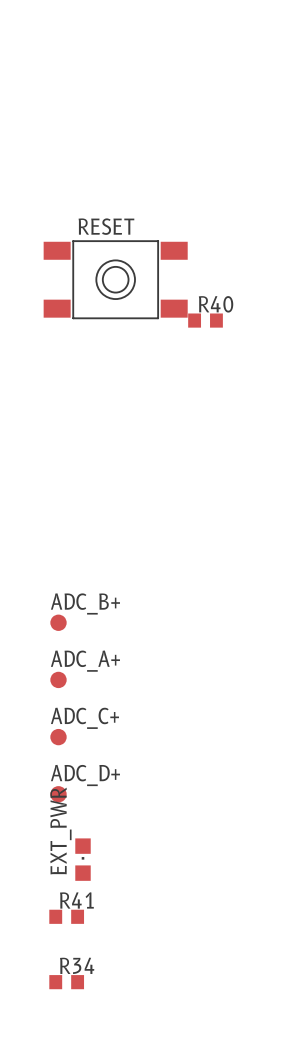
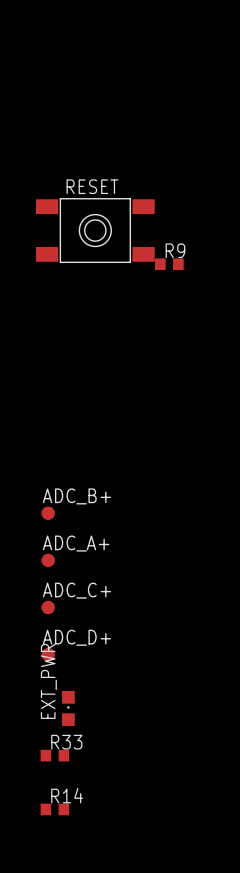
R40 name: R40 (216, 304) -> R9 (175, 250)
R41 name: R41 (76, 900) -> R33 (66, 742)
R34 name: R34 (77, 965) -> R14 (67, 795)

